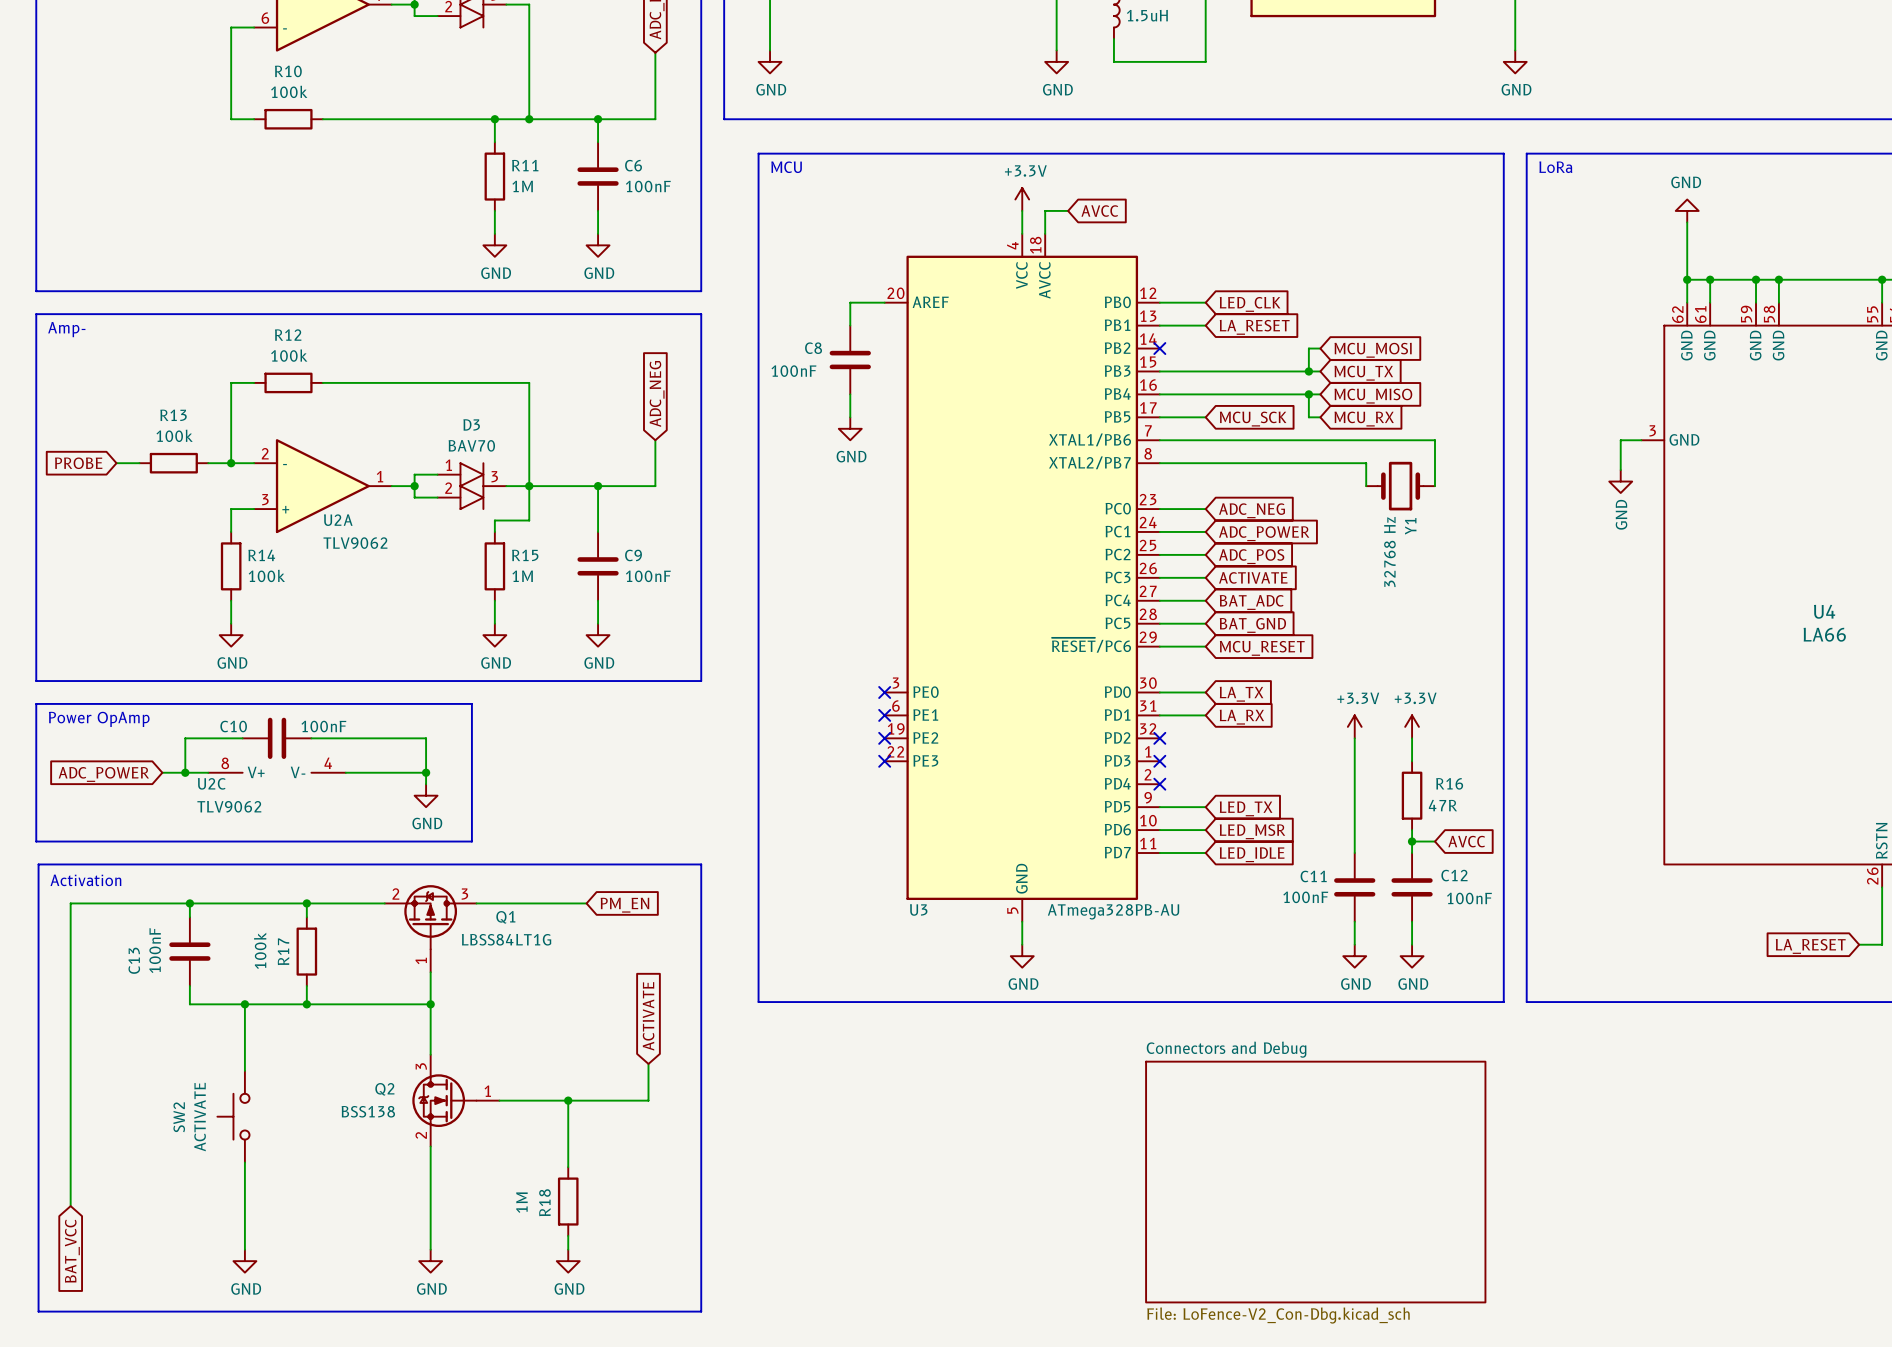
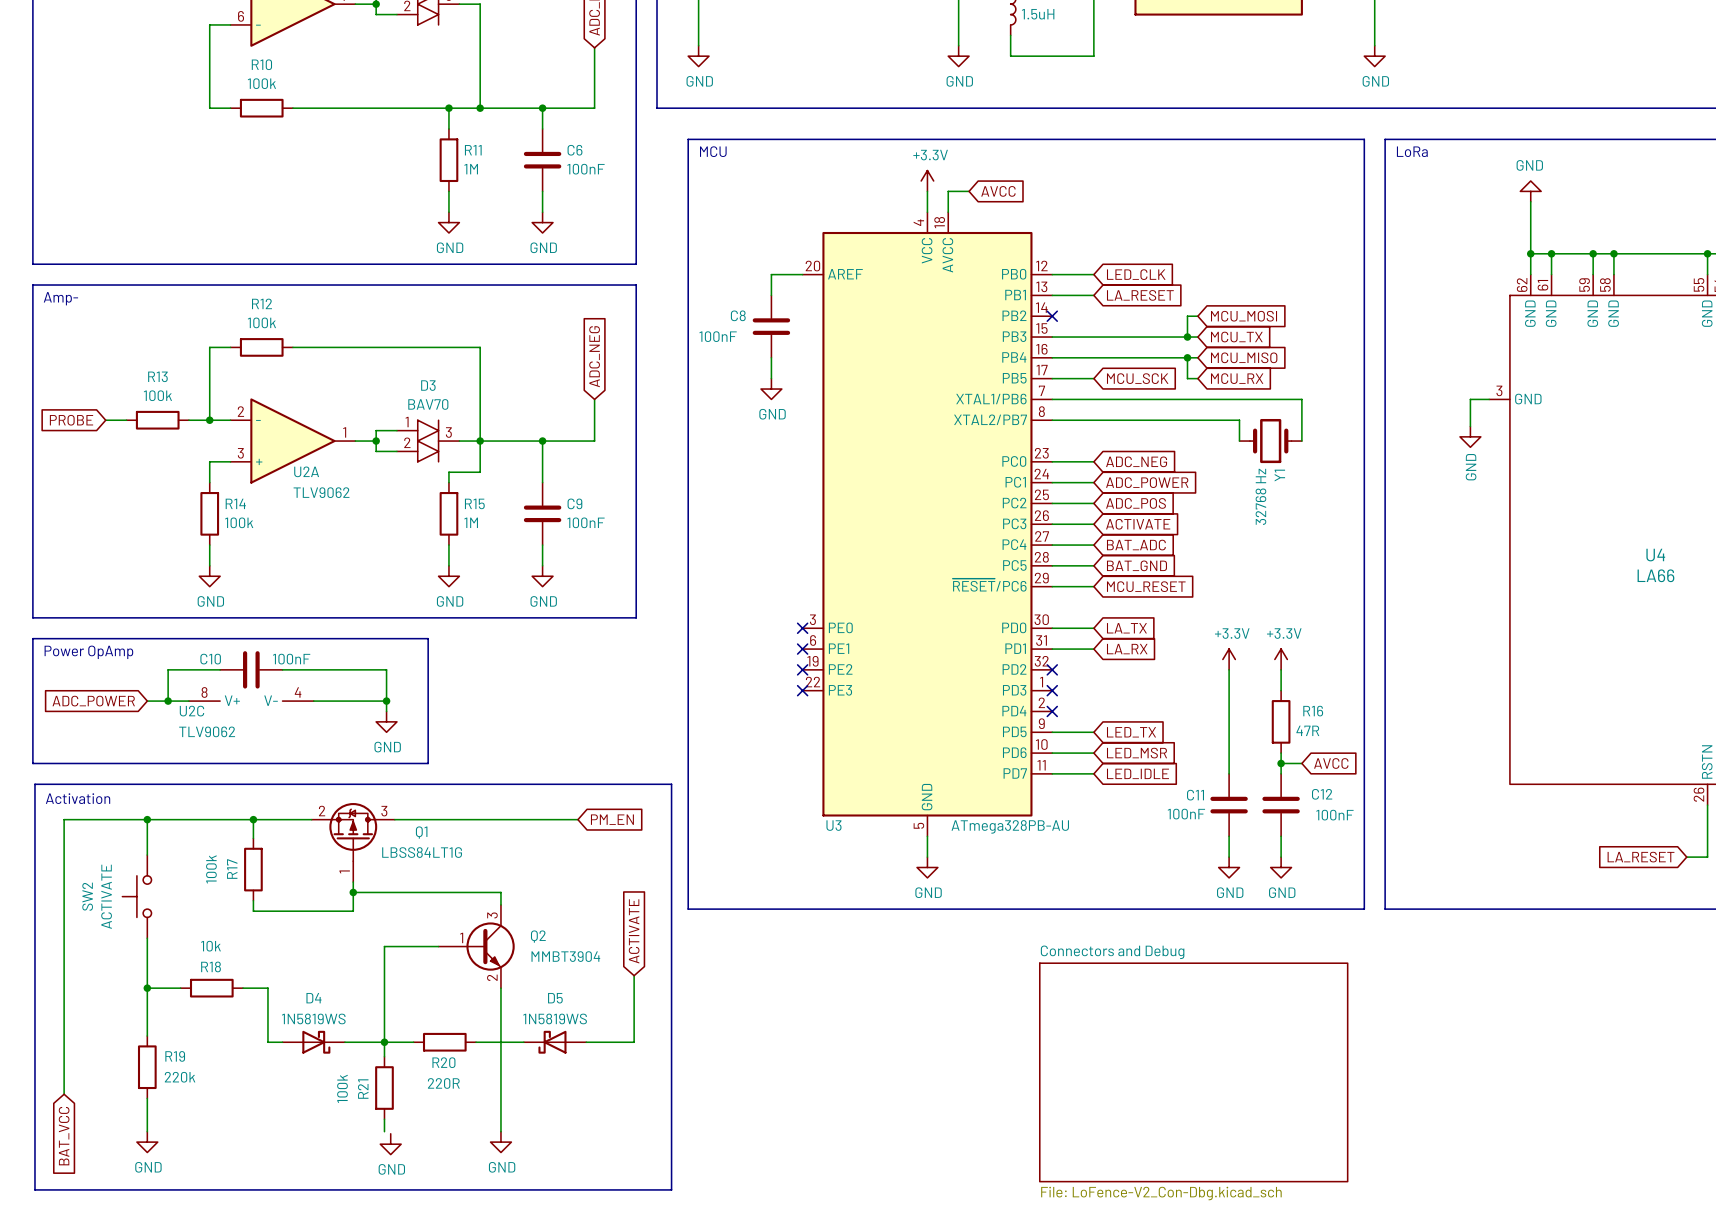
line: (701, 864) (701, 1311) -> (636, 784) (671, 784) (671, 1189) (636, 1189)
wire: none -> (147, 819) (147, 855)
wire: (189, 903) (189, 917) -> none
junction position: (189, 903) -> (147, 819)
wire: none -> (253, 819) (253, 838)
wire: (306, 903) (306, 917) -> none
junction position: (306, 903) -> (253, 819)
wire: none -> (532, 819) (577, 819)
global label position: PM_EN (624, 905) -> PM_EN (612, 819)
Q1 position: (430, 928) -> (353, 842)
C13: 100nF (189, 951) -> none
R17 position: (306, 951) -> (253, 869)
wire: (430, 972) (430, 1054) -> none
wire: none -> (353, 892) (500, 892) (500, 904)
junction: none -> (353, 892)
wire: (189, 985) (189, 1004) (279, 1004) -> (253, 900) (253, 911)
wire: (306, 985) (306, 1004) -> none
wire: (244, 1004) (244, 1070) -> none
junction: (244, 1004) -> none
junction: (306, 1004) -> none
wire: (389, 1004) (430, 1004) -> (353, 911) (353, 882)
junction: (430, 1004) -> none
global label position: ACTIVATE (648, 1016) -> ACTIVATE (634, 931)
wire: none -> (147, 938) (147, 1036)
wire: none -> (438, 946) (384, 946) (384, 1056)
Q2 symbol: [412, 1054, 500, 1147] -> [438, 904, 515, 989]
wire: (648, 1063) (648, 1100) (499, 1100) -> none
wire: none -> (634, 975) (634, 1042) (586, 1042)
wire: none -> (147, 988) (180, 988)
junction: none -> (147, 988)
wire: none -> (243, 988) (267, 988) (267, 1042) (282, 1042)
Q2 name position: Q2 (384, 1089) -> Q2 (538, 936)
wire: none -> (500, 988) (500, 1131)
wire: (568, 1100) (568, 1167) -> none
junction: (568, 1100) -> none
Q2 value: BSS138 (368, 1111) -> MMBT3904 (565, 956)
SW2 position: (233, 1116) -> (136, 896)
wire: (430, 1146) (430, 1249) -> none
D4: none -> 1N5819WS (313, 1042)
wire: none -> (344, 1042) (413, 1042)
junction: none -> (384, 1042)
R20: none -> 220R (444, 1042)
wire: none -> (476, 1042) (523, 1042)
D5: none -> 1N5819WS (555, 1042)
wire: (244, 1162) (244, 1249) -> none
R19: none -> 220k (147, 1067)
R21: none -> 100k (384, 1088)
R18 rotation: 0° (568, 1201) -> 90° clockwise (211, 988)
R18 position: (568, 1201) -> (211, 988)
R18 value: 1M (521, 1202) -> 10k (210, 946)
wire: none -> (147, 1098) (147, 1131)
wire: (568, 1235) (568, 1249) -> (384, 1119) (384, 1131)
power symbol position: GND (244, 1261) -> GND (147, 1142)
power symbol position: GND (568, 1261) -> GND (500, 1142)

